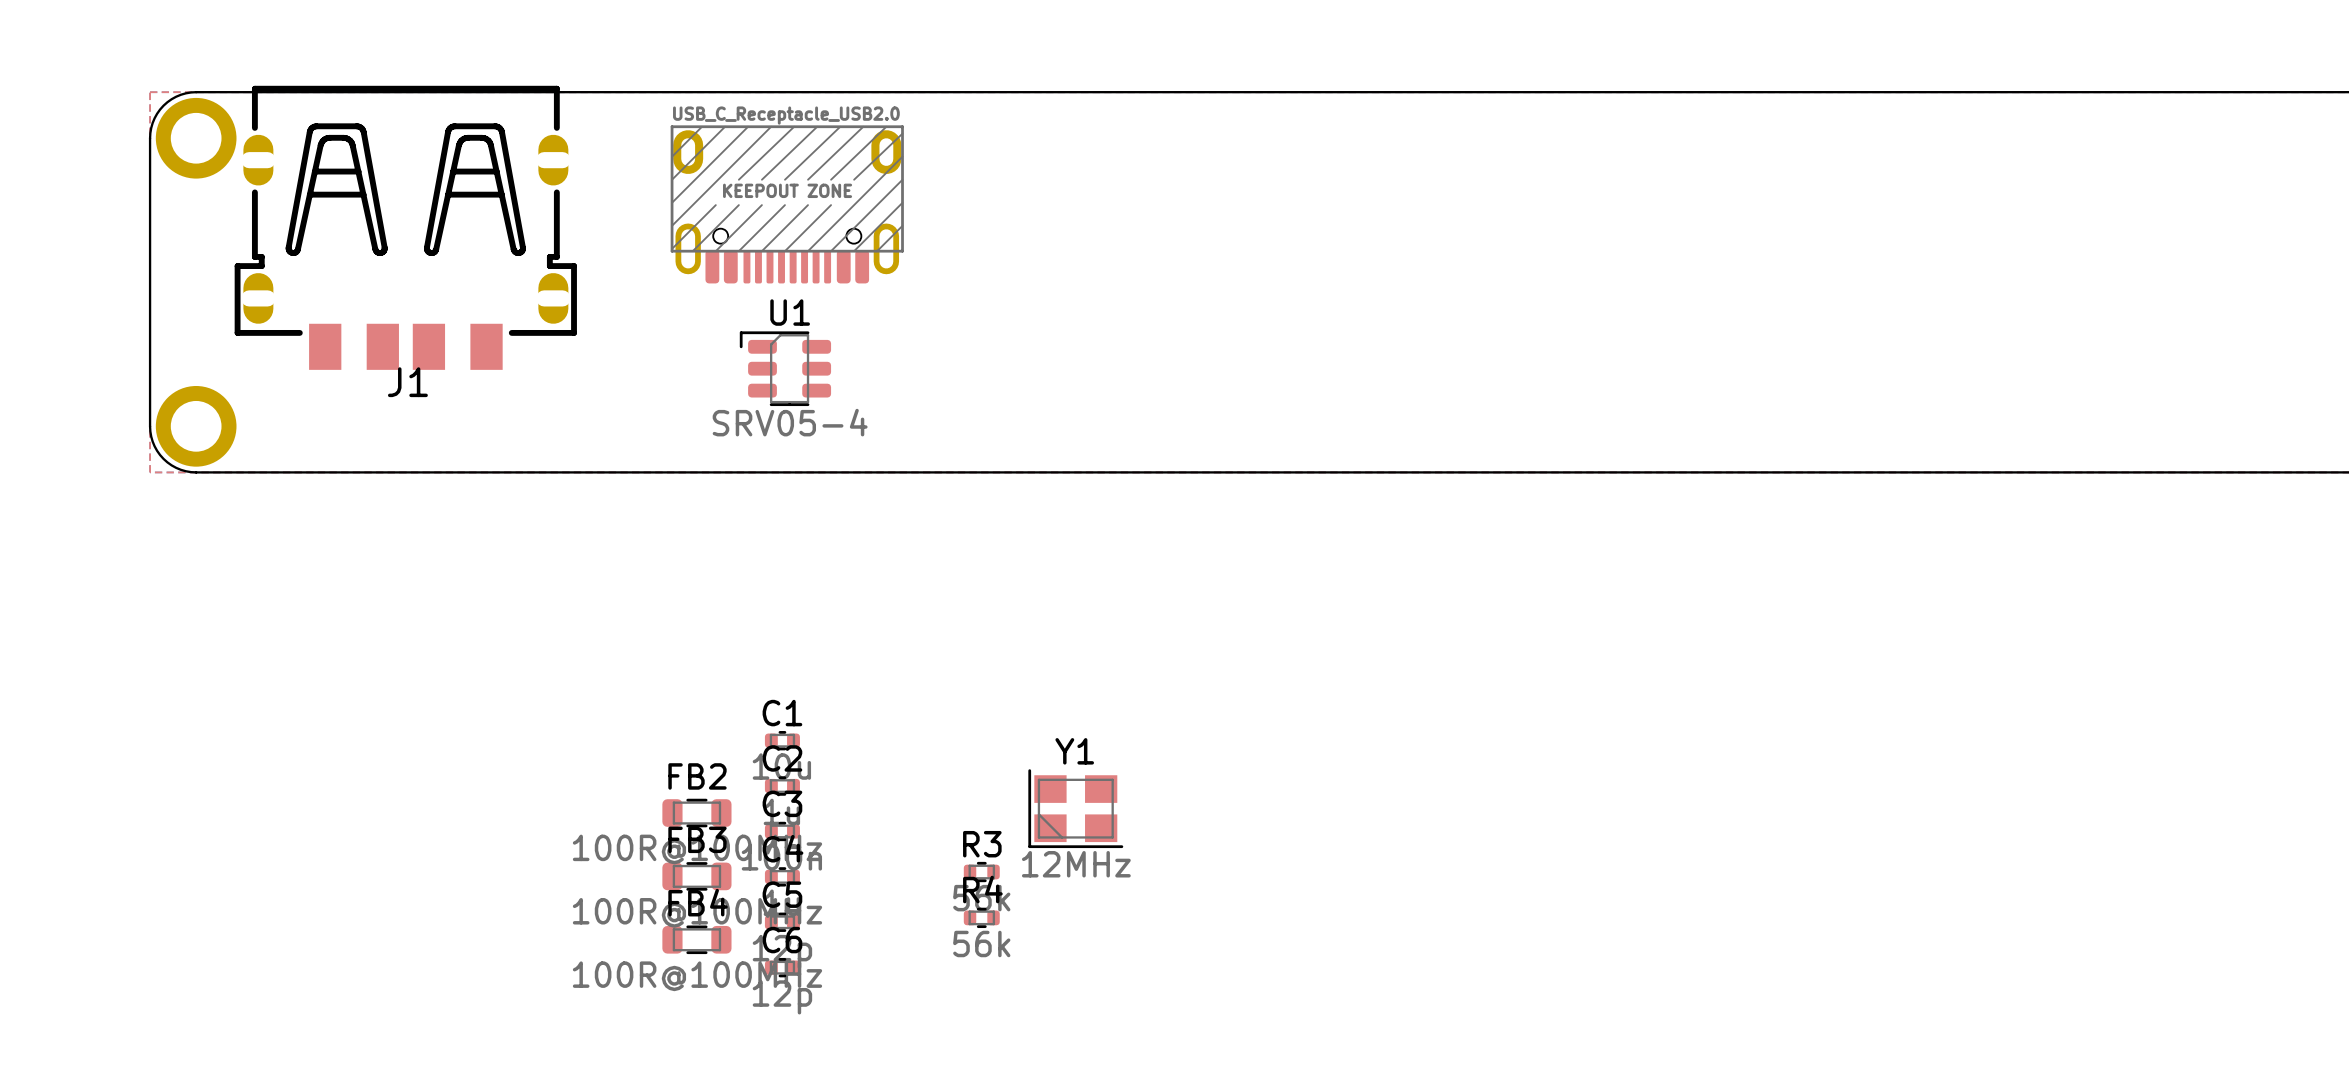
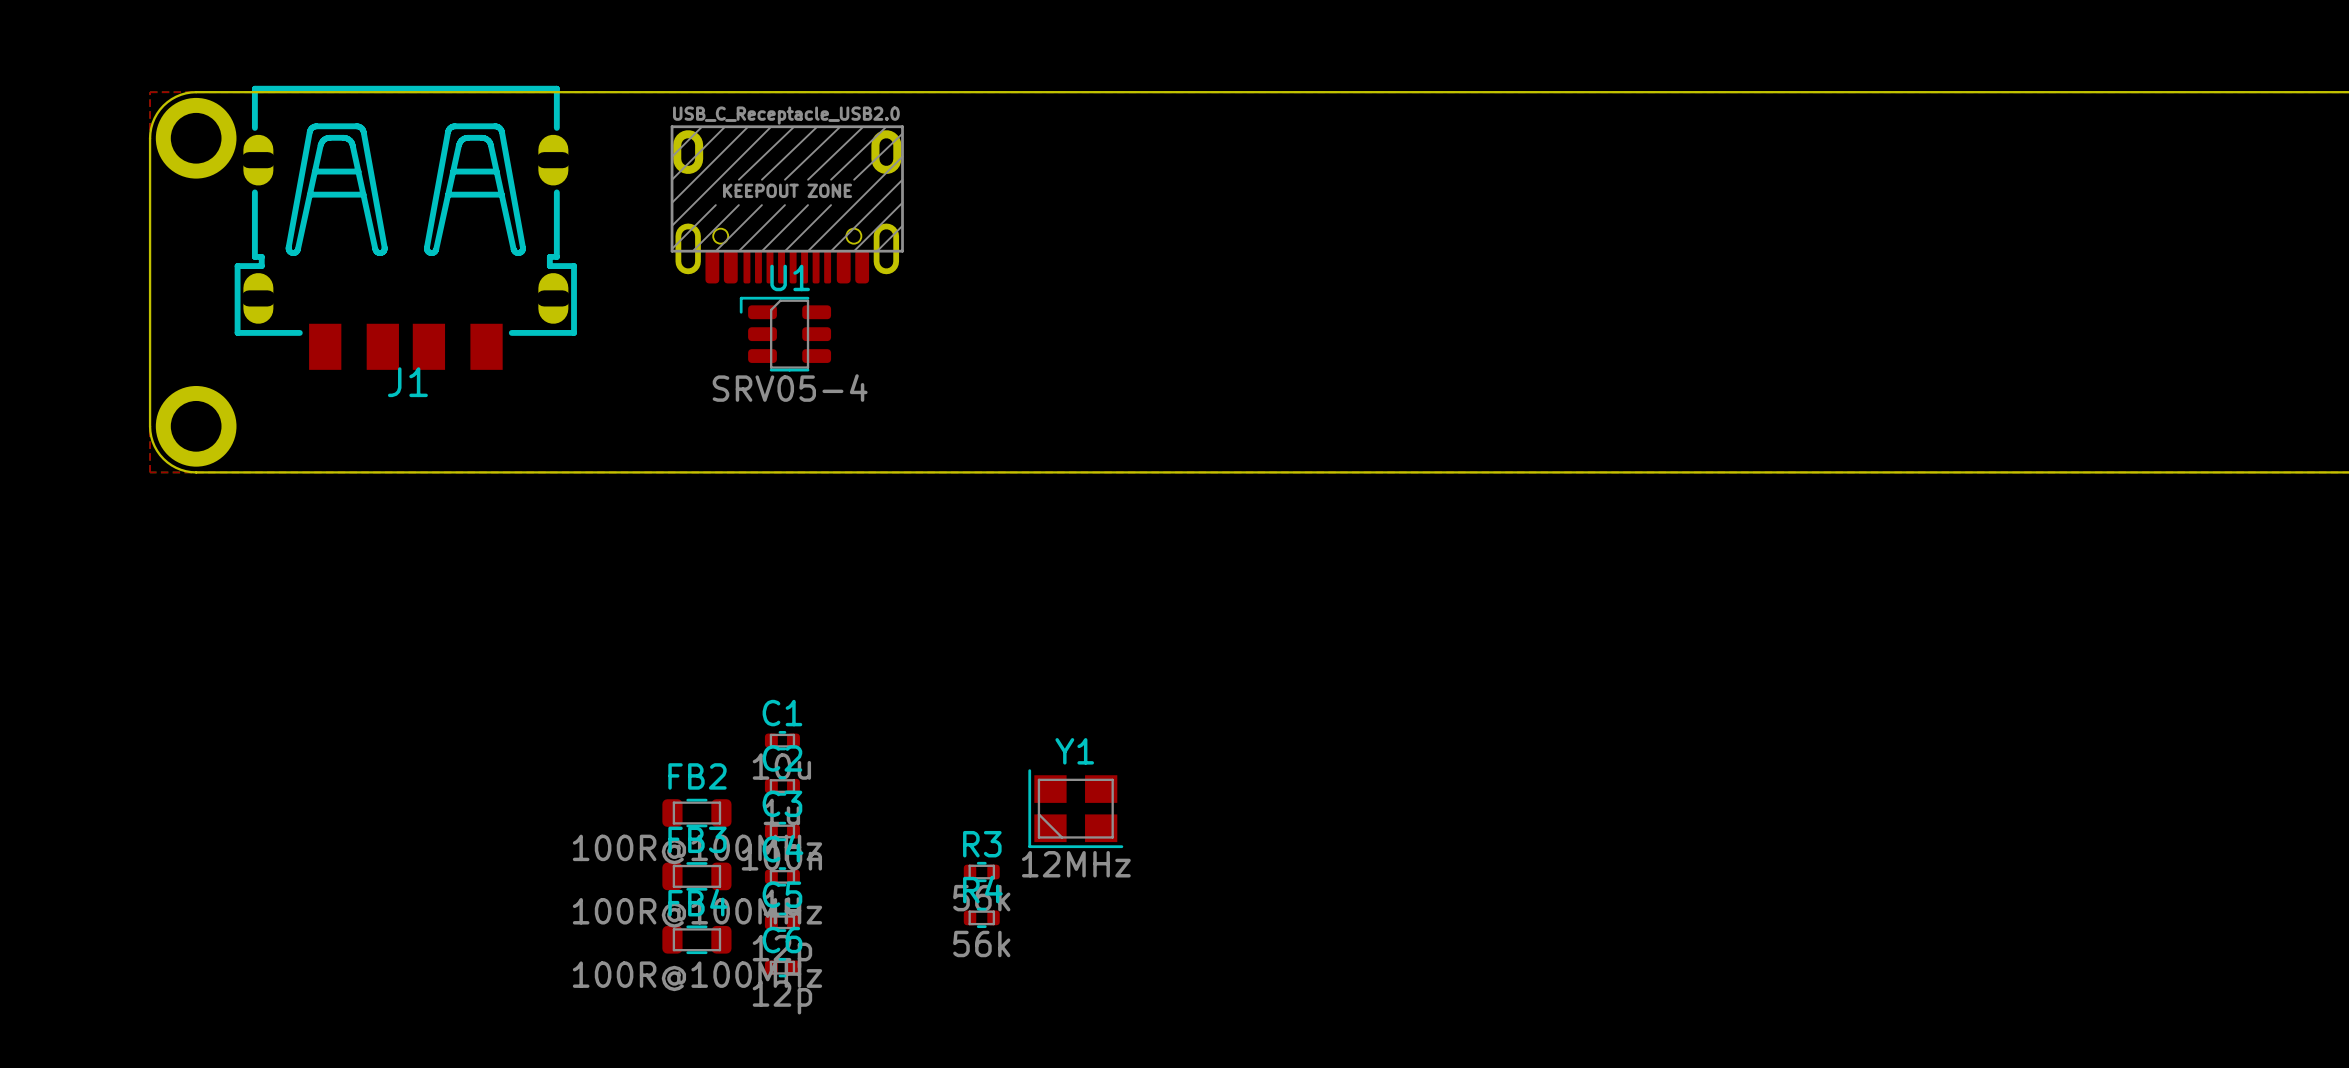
U1 position: (785, 368) -> (785, 334)

